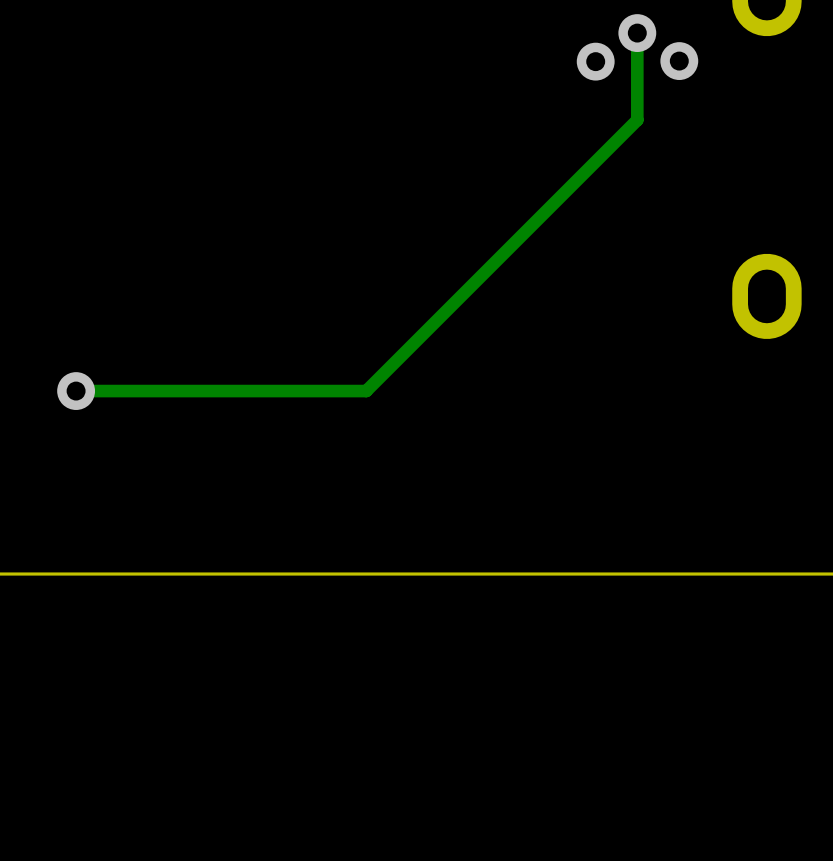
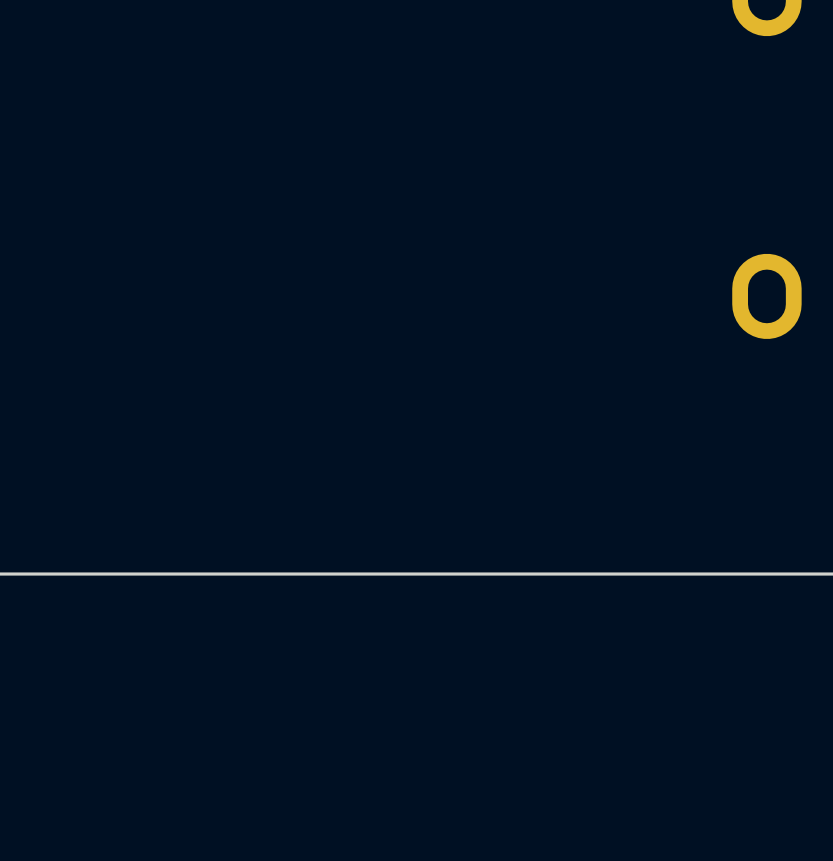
track: (637, 33) (637, 120) (366, 391) (76, 391) -> none
via: (637, 33) -> none
via: (595, 61) -> none
via: (679, 61) -> none
via: (76, 391) -> none

